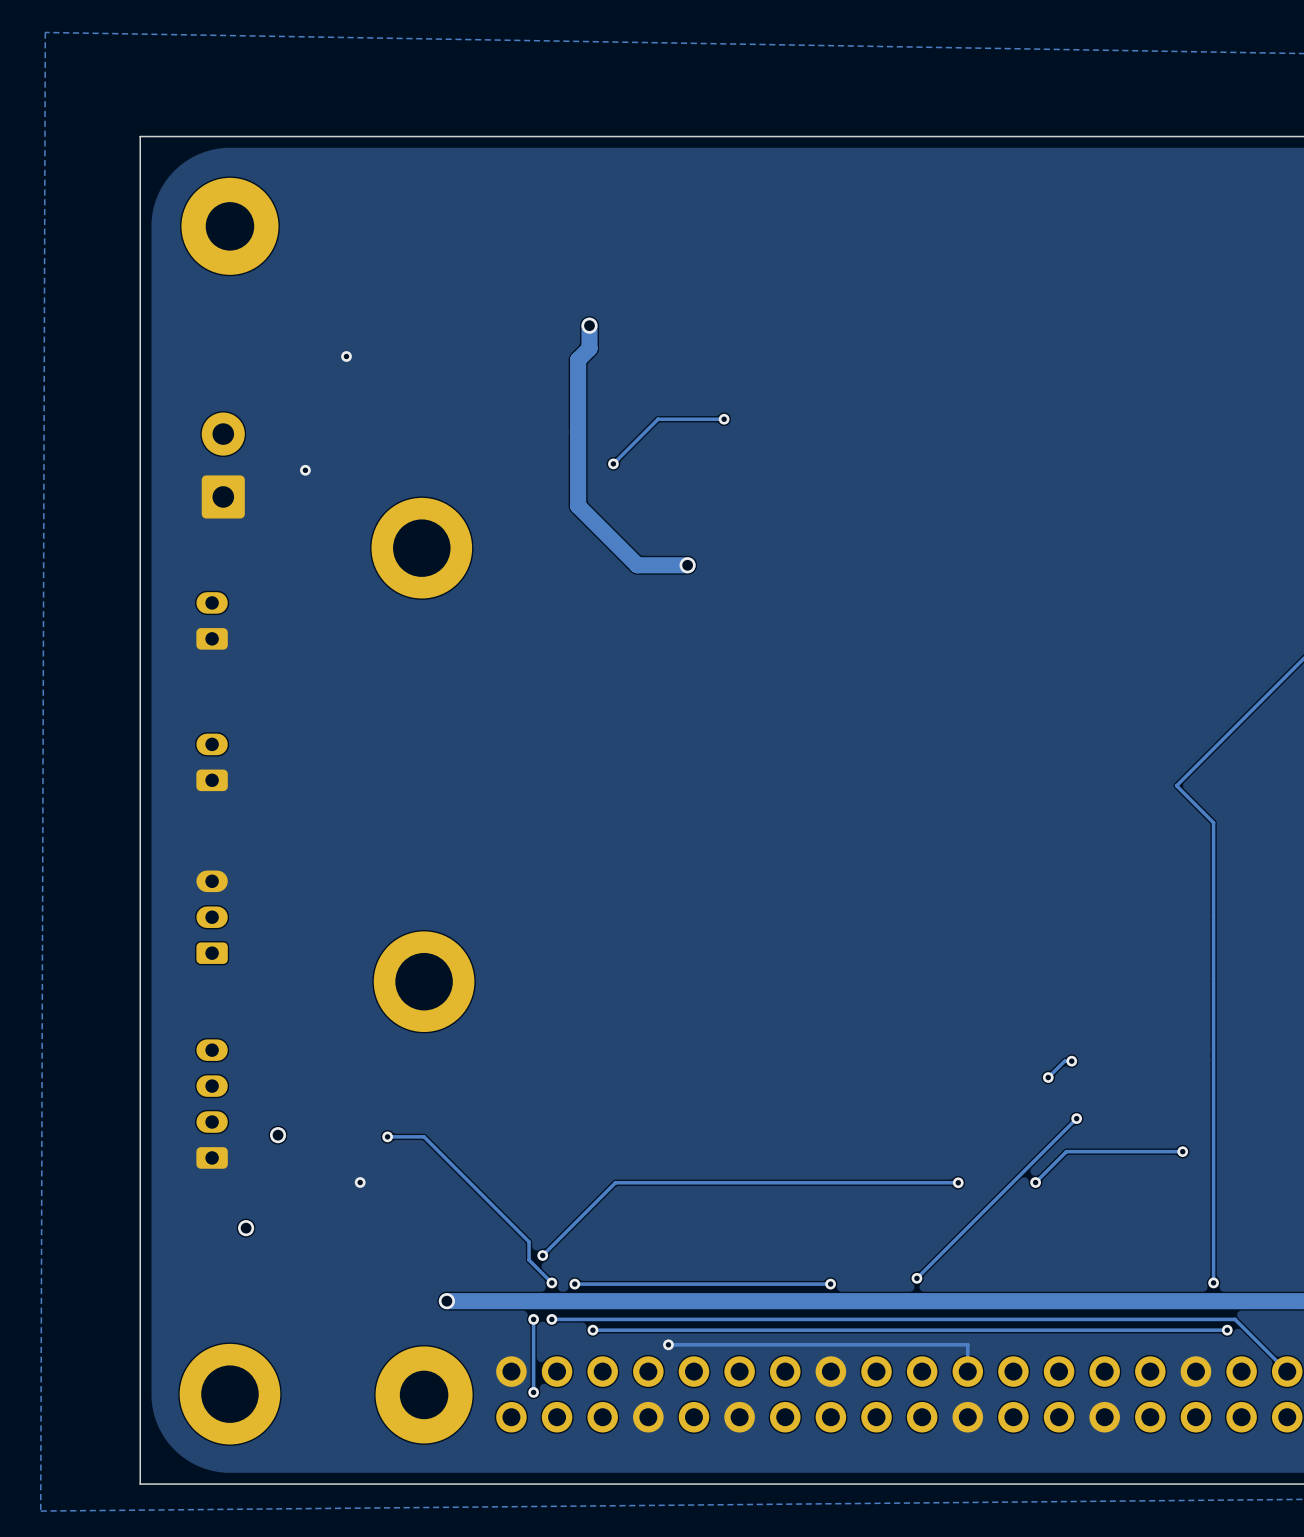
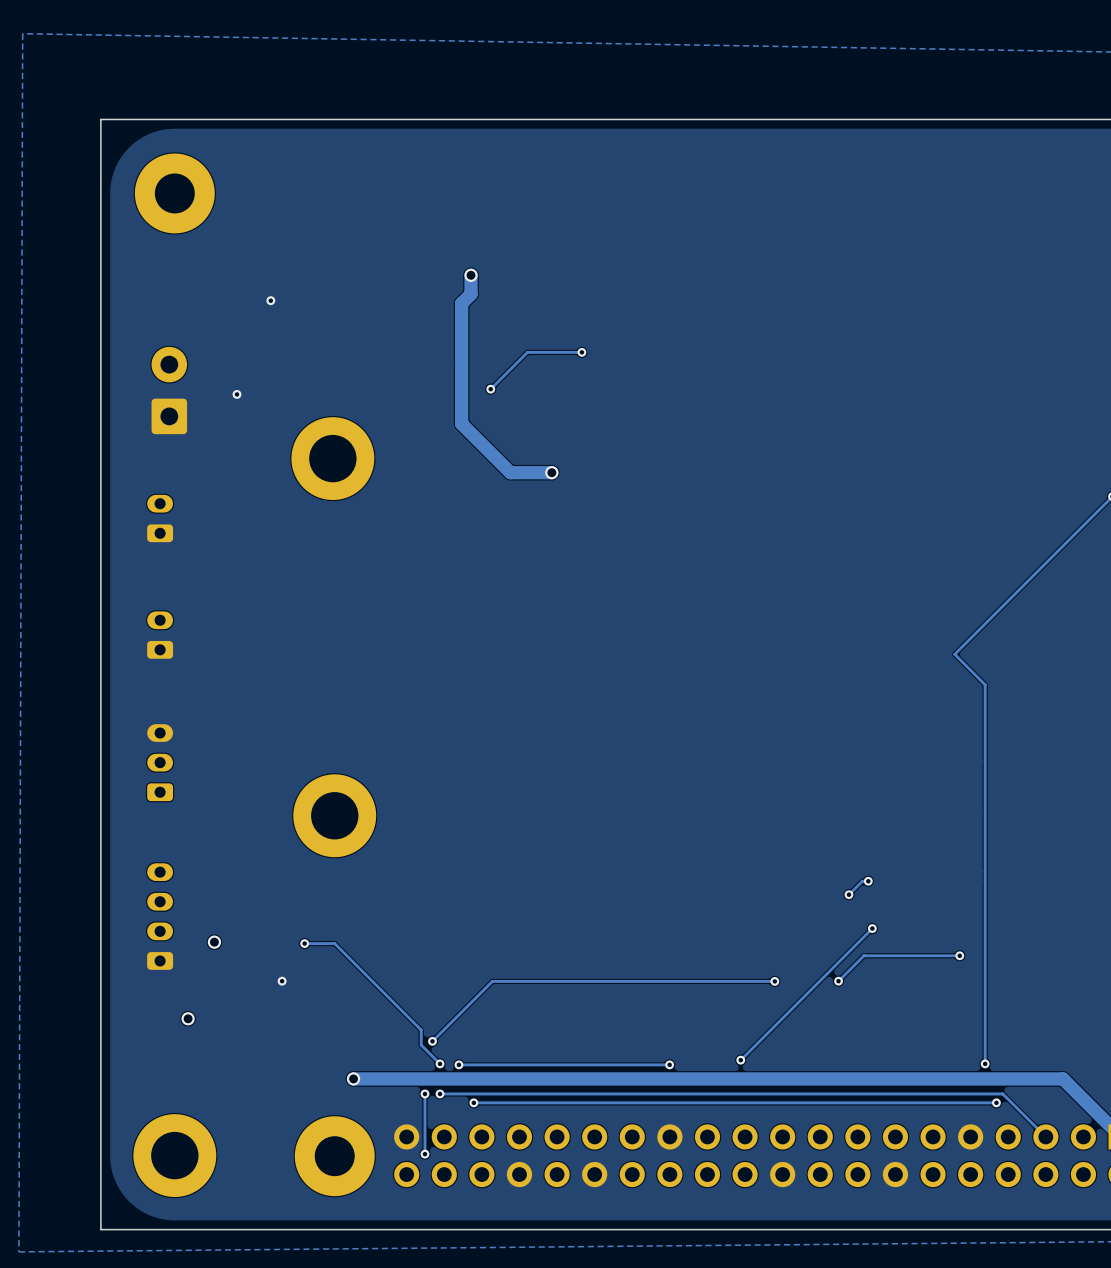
track: (668, 1344) (967, 1344) (967, 1371) -> none
via: (668, 1344) -> none

